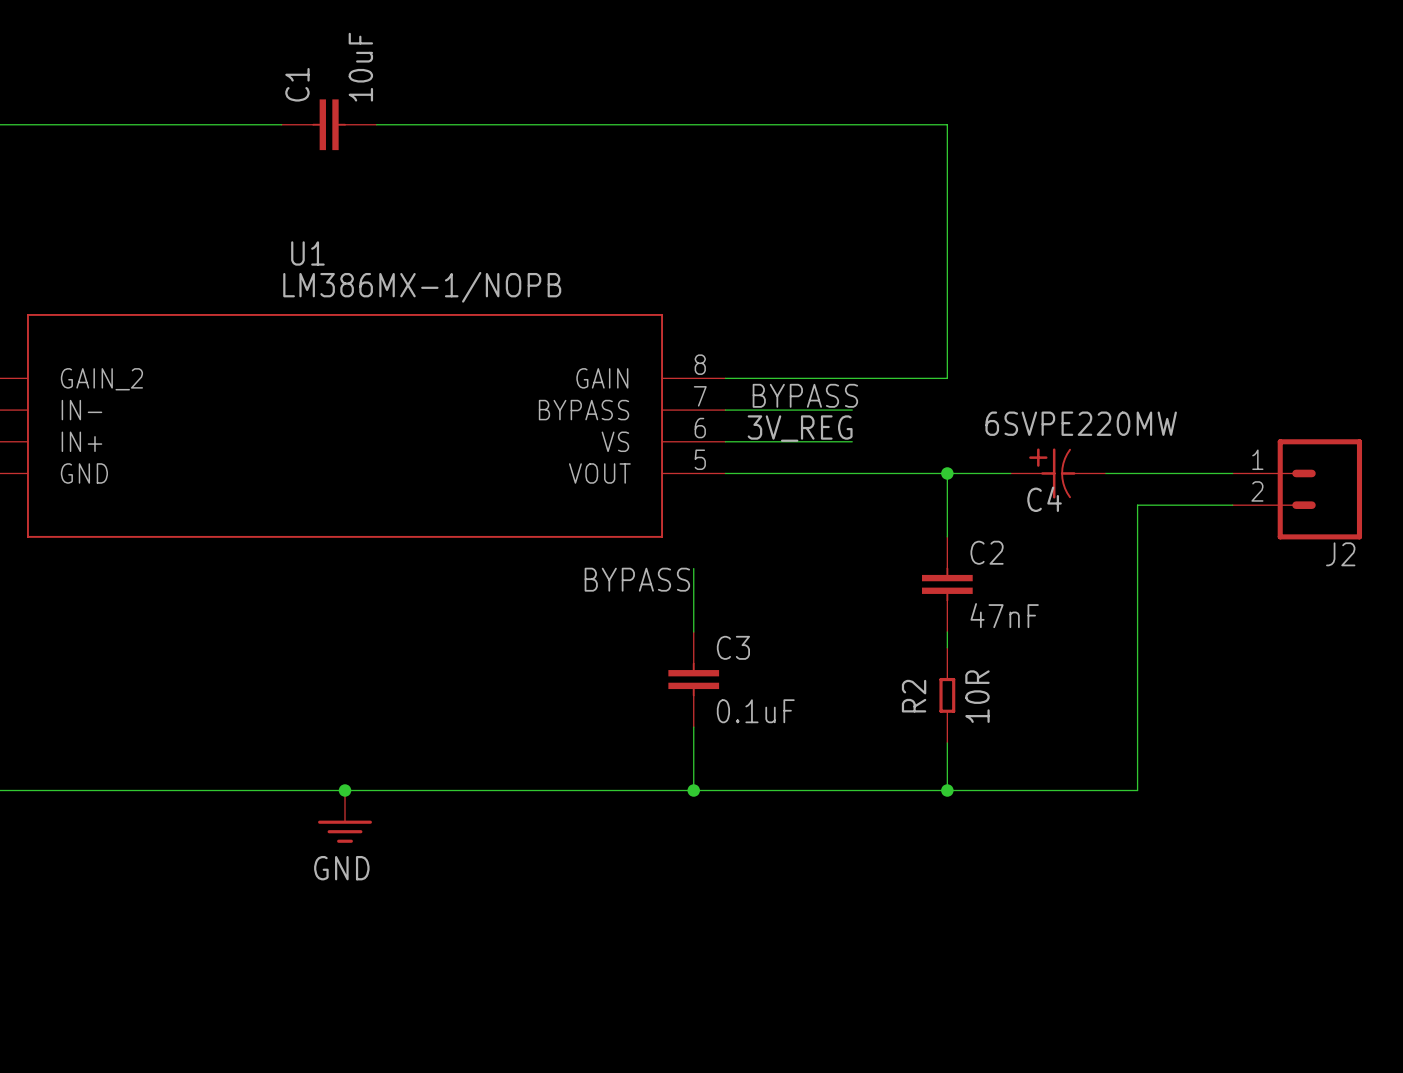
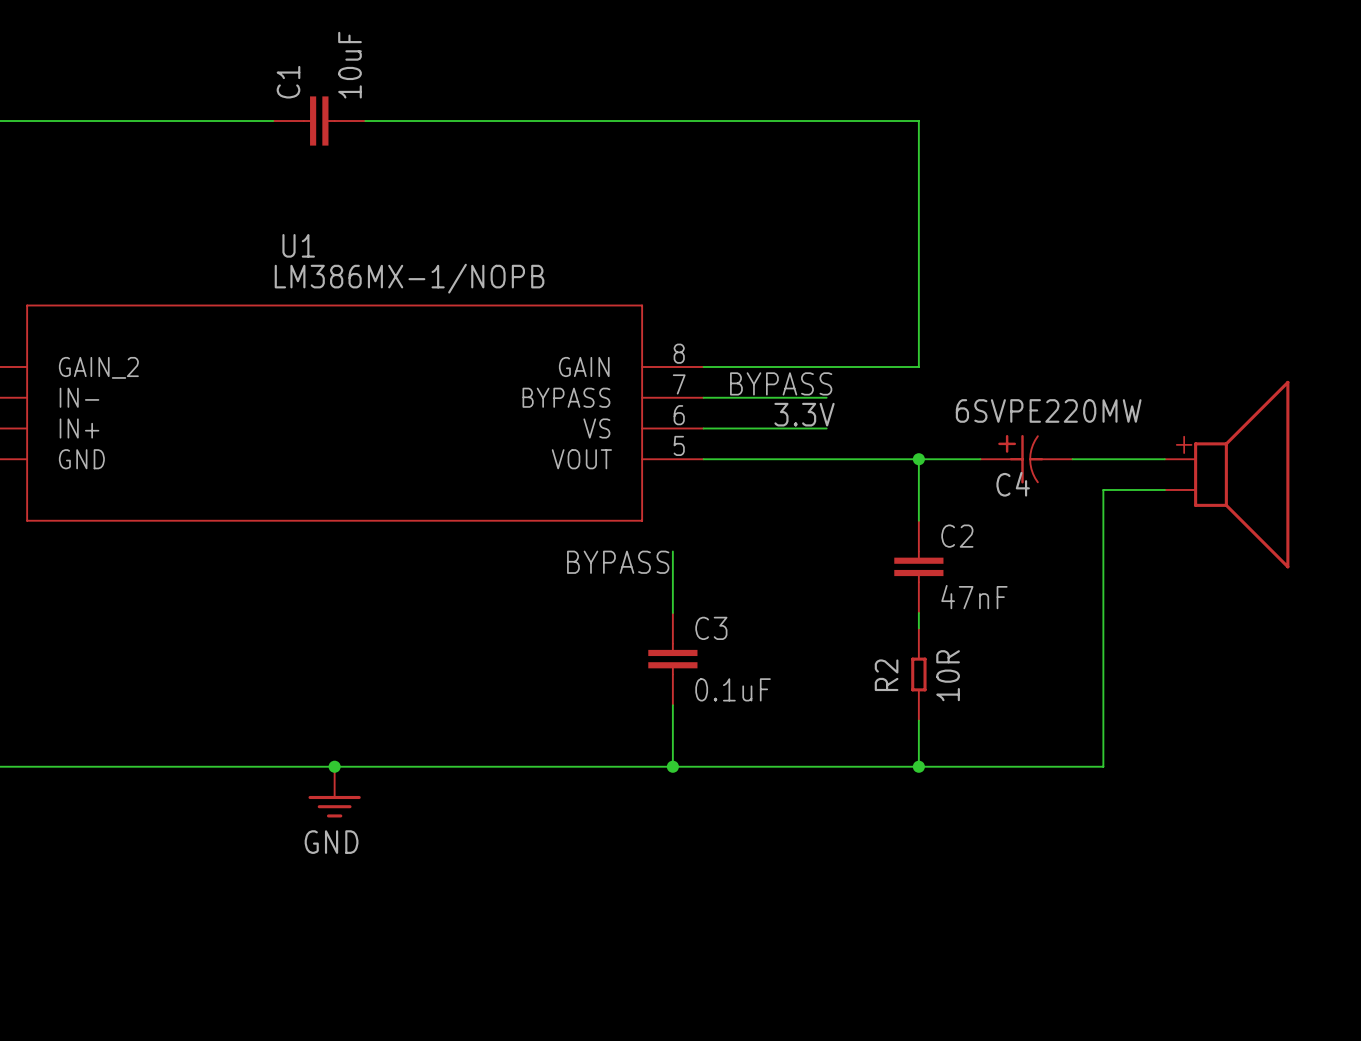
label: none -> 3.3V (804, 414)
label: 3V_REG (800, 428) -> none
part: none -> (1227, 474)
J2: (1297, 489) -> none

